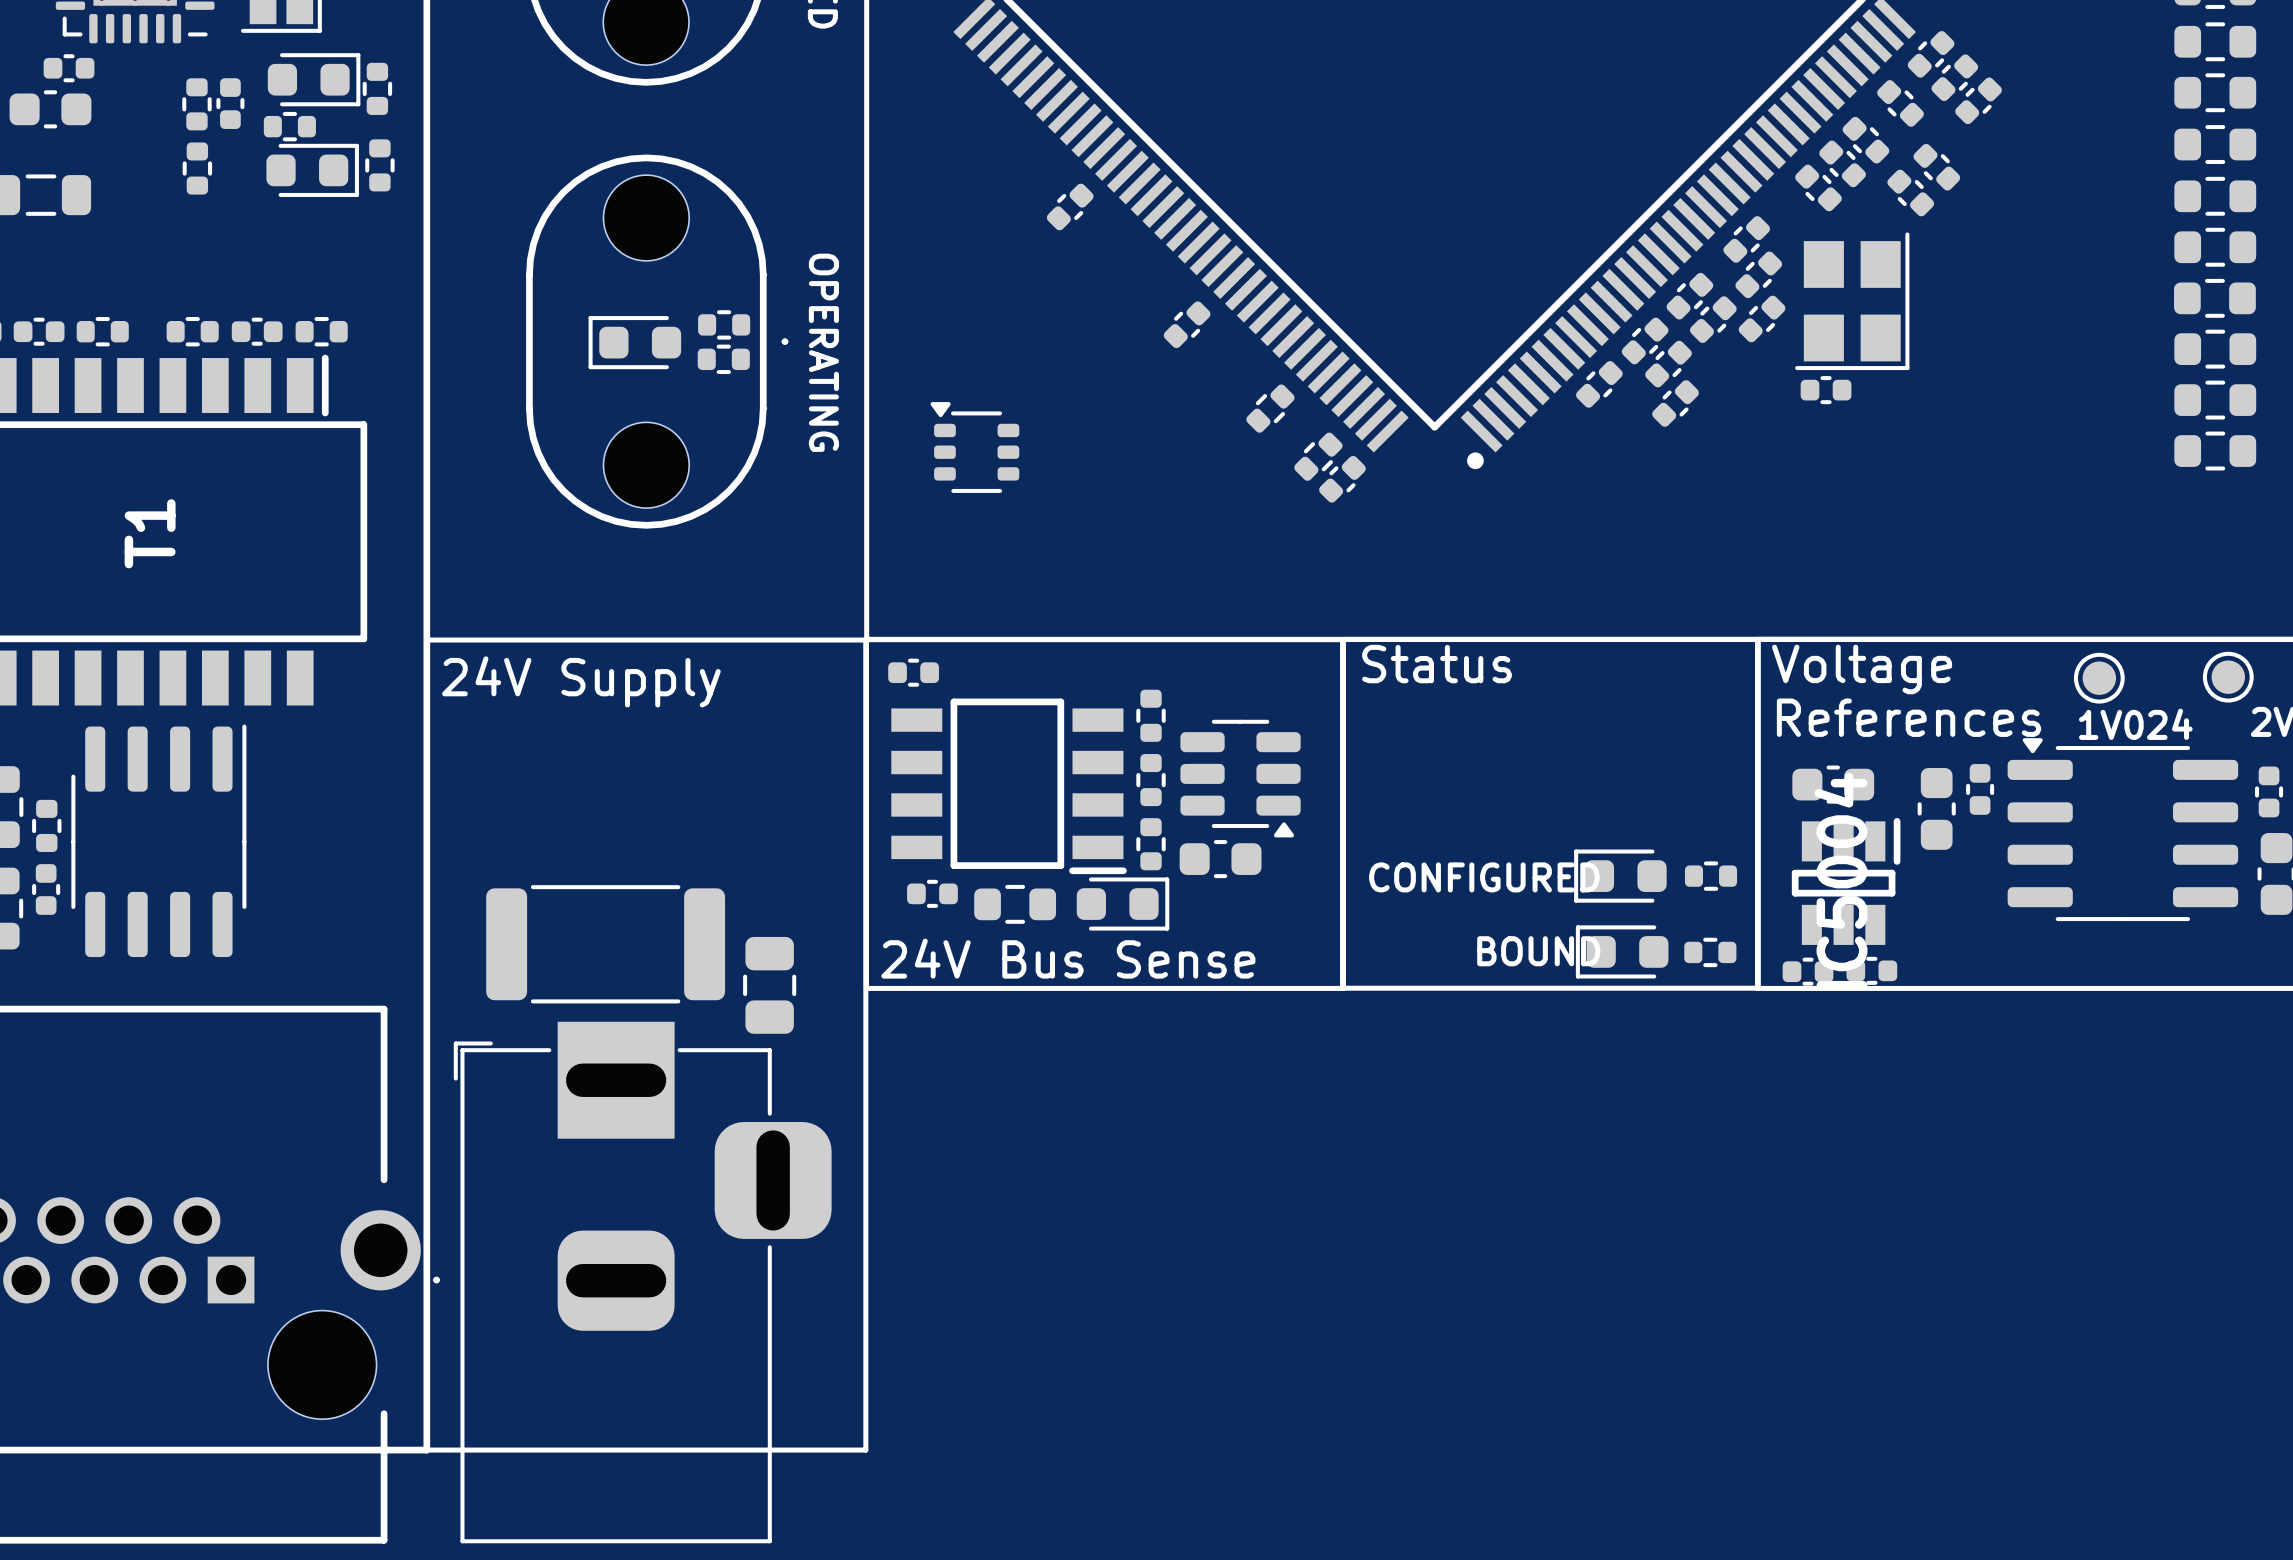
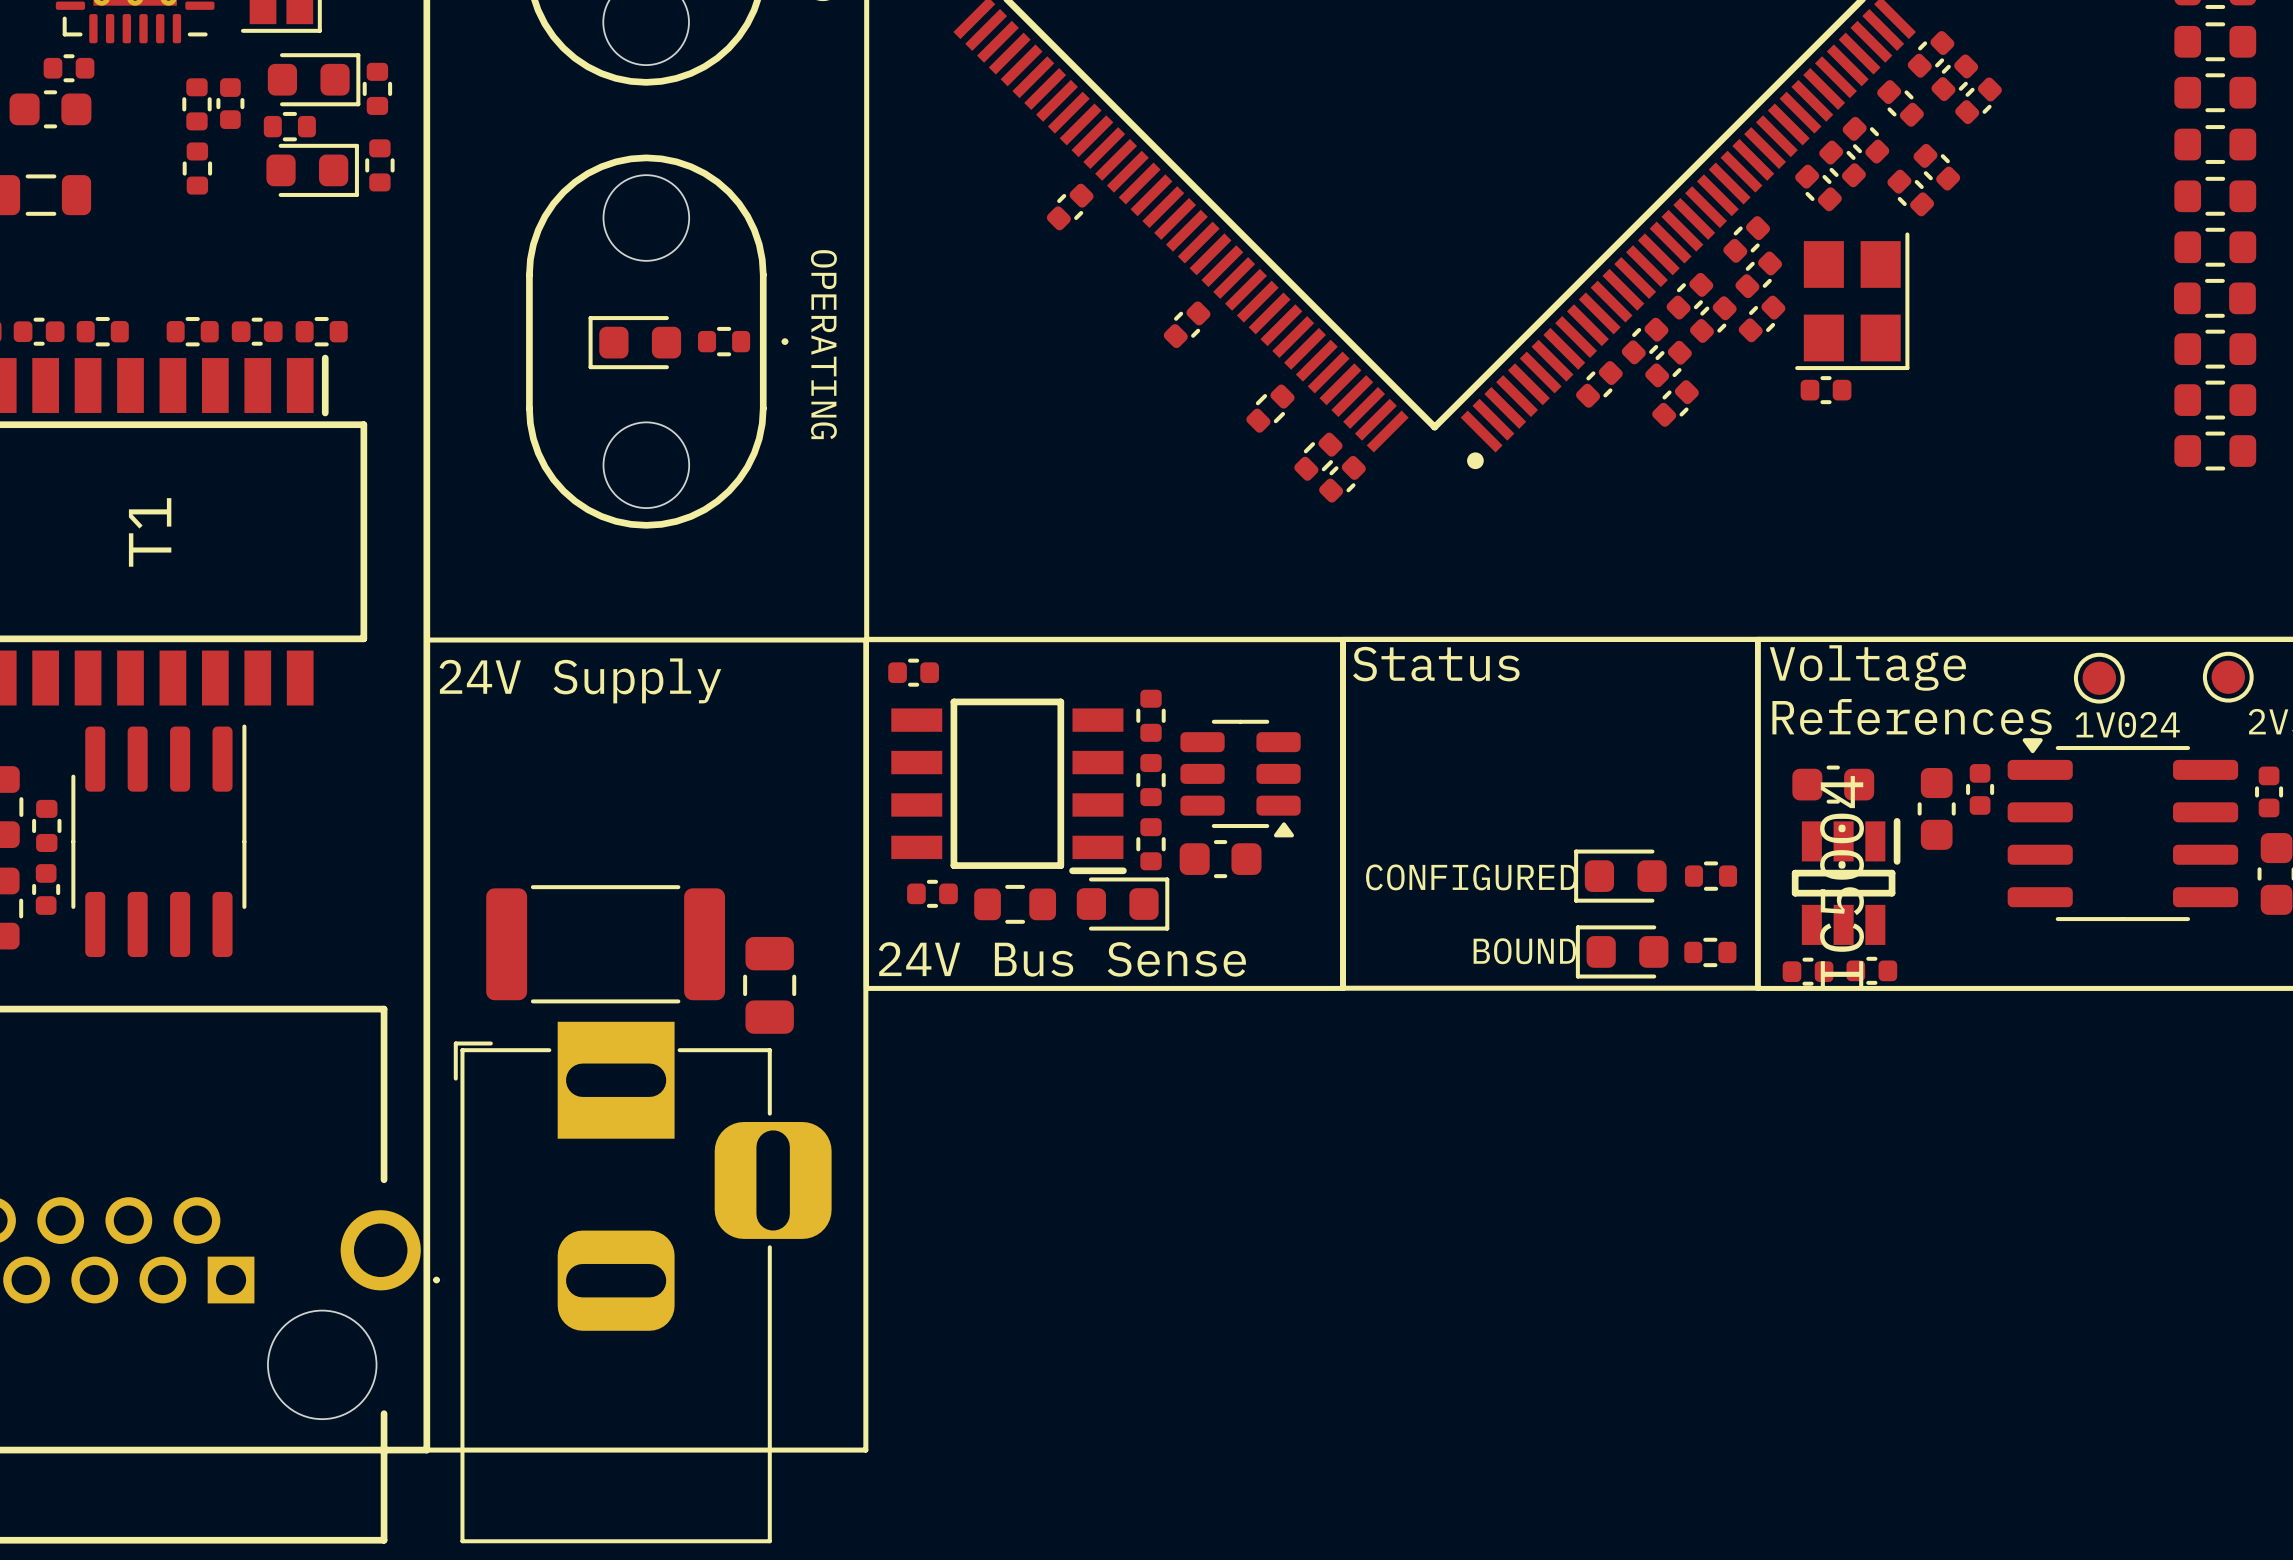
part: (724, 324) -> none
part: none -> (724, 341)
part: (723, 359) -> none
part: (974, 447) -> none

